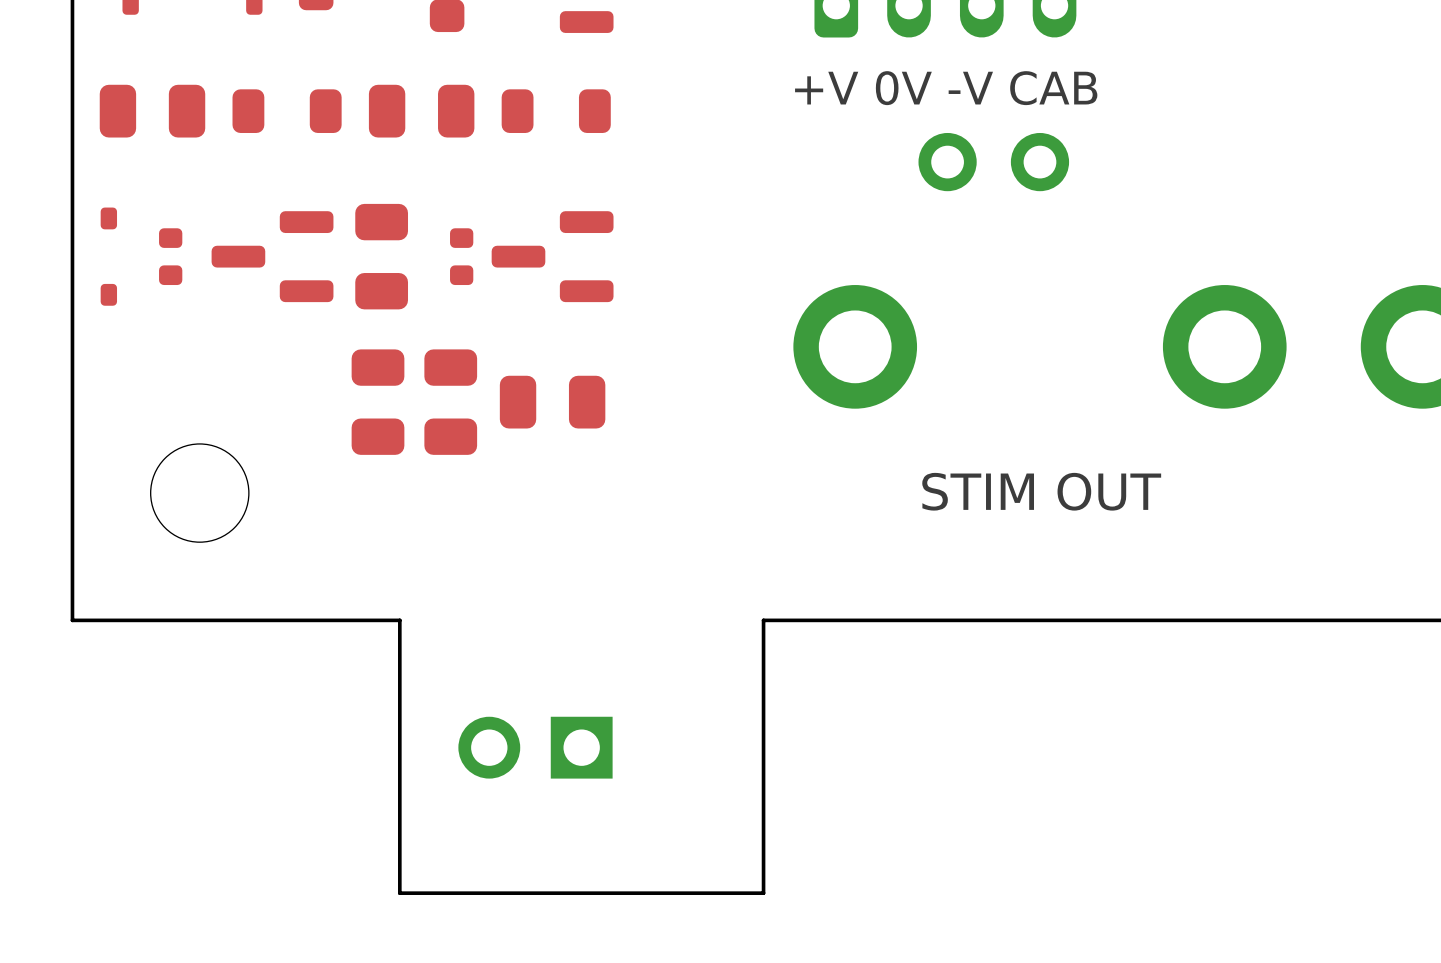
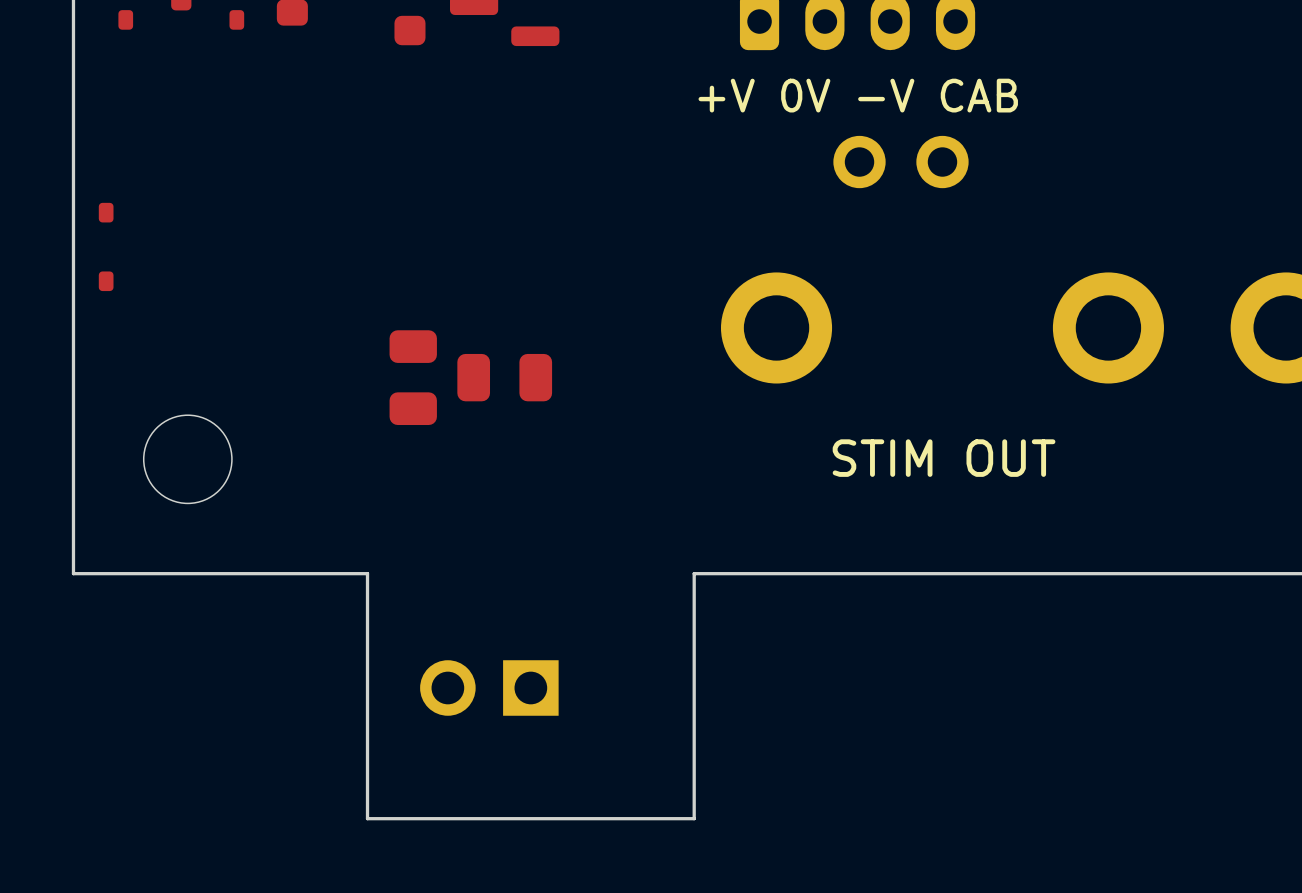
part: (152, 111) -> none
part: (287, 111) -> none
part: (421, 111) -> none
part: (556, 111) -> none
part: (170, 256) -> none
part: (272, 256) -> none
part: (381, 256) -> none
part: (461, 256) -> none
part: (552, 256) -> none
part: (378, 402) -> none

